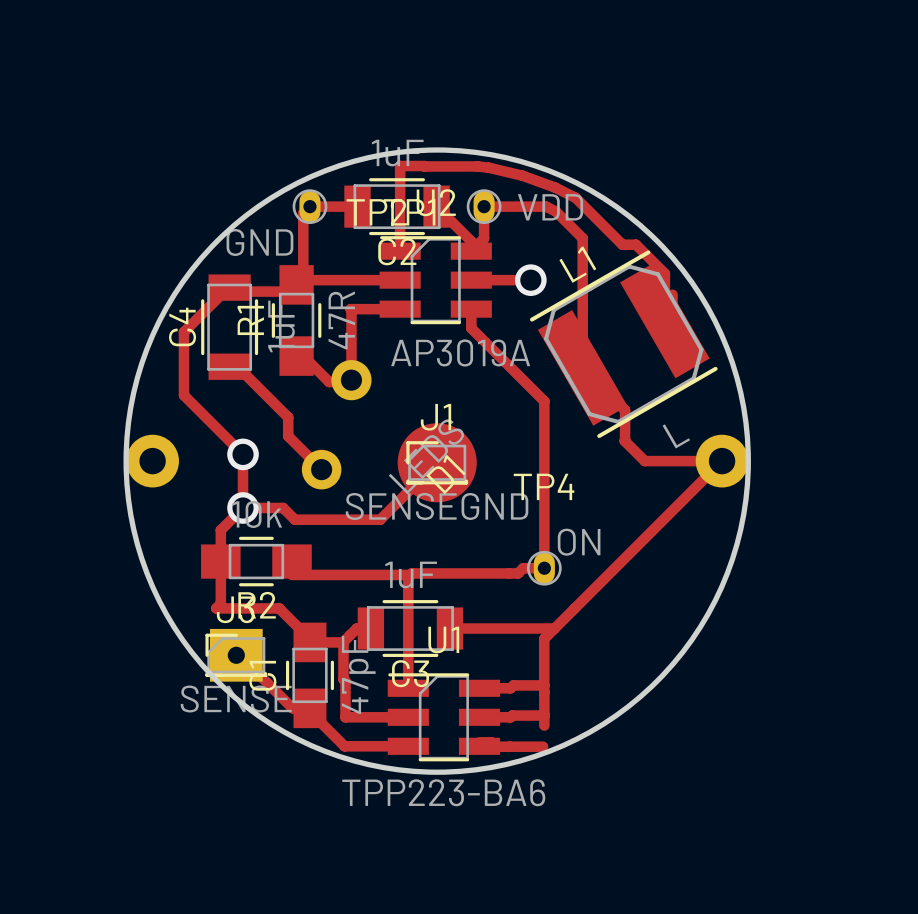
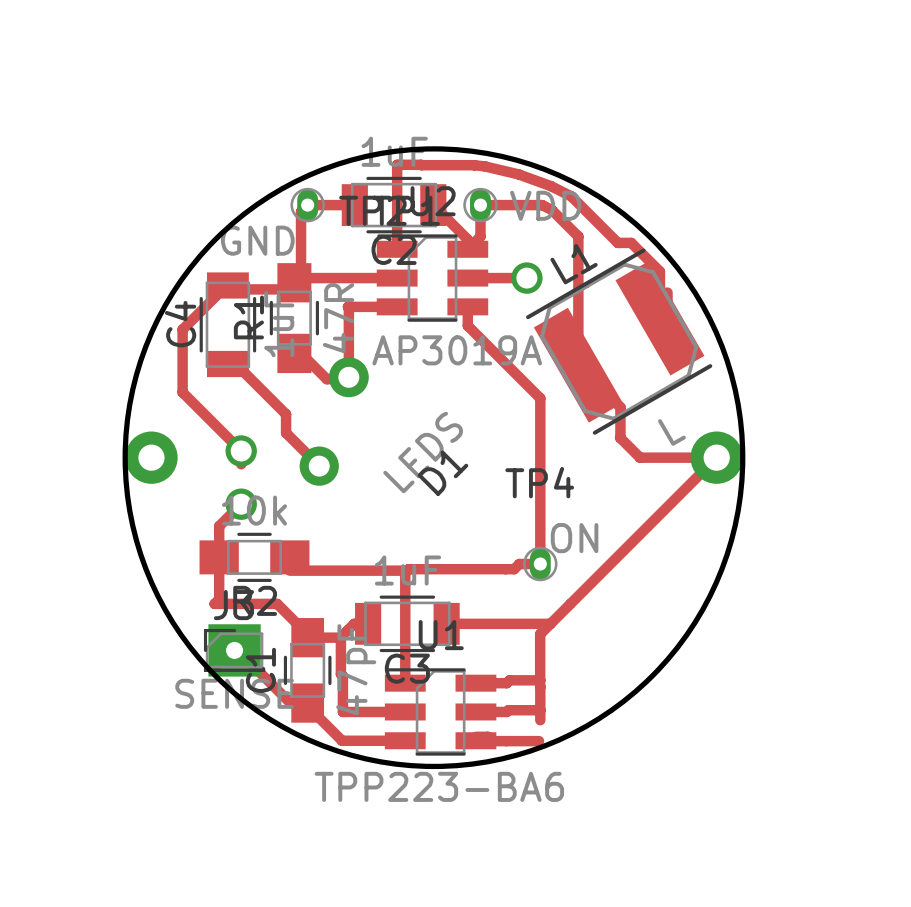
track: (437, 462) (380, 519) (294, 519) (283, 507) (243, 507) (243, 467) -> none
J1: SENSEGND (437, 462) -> none

